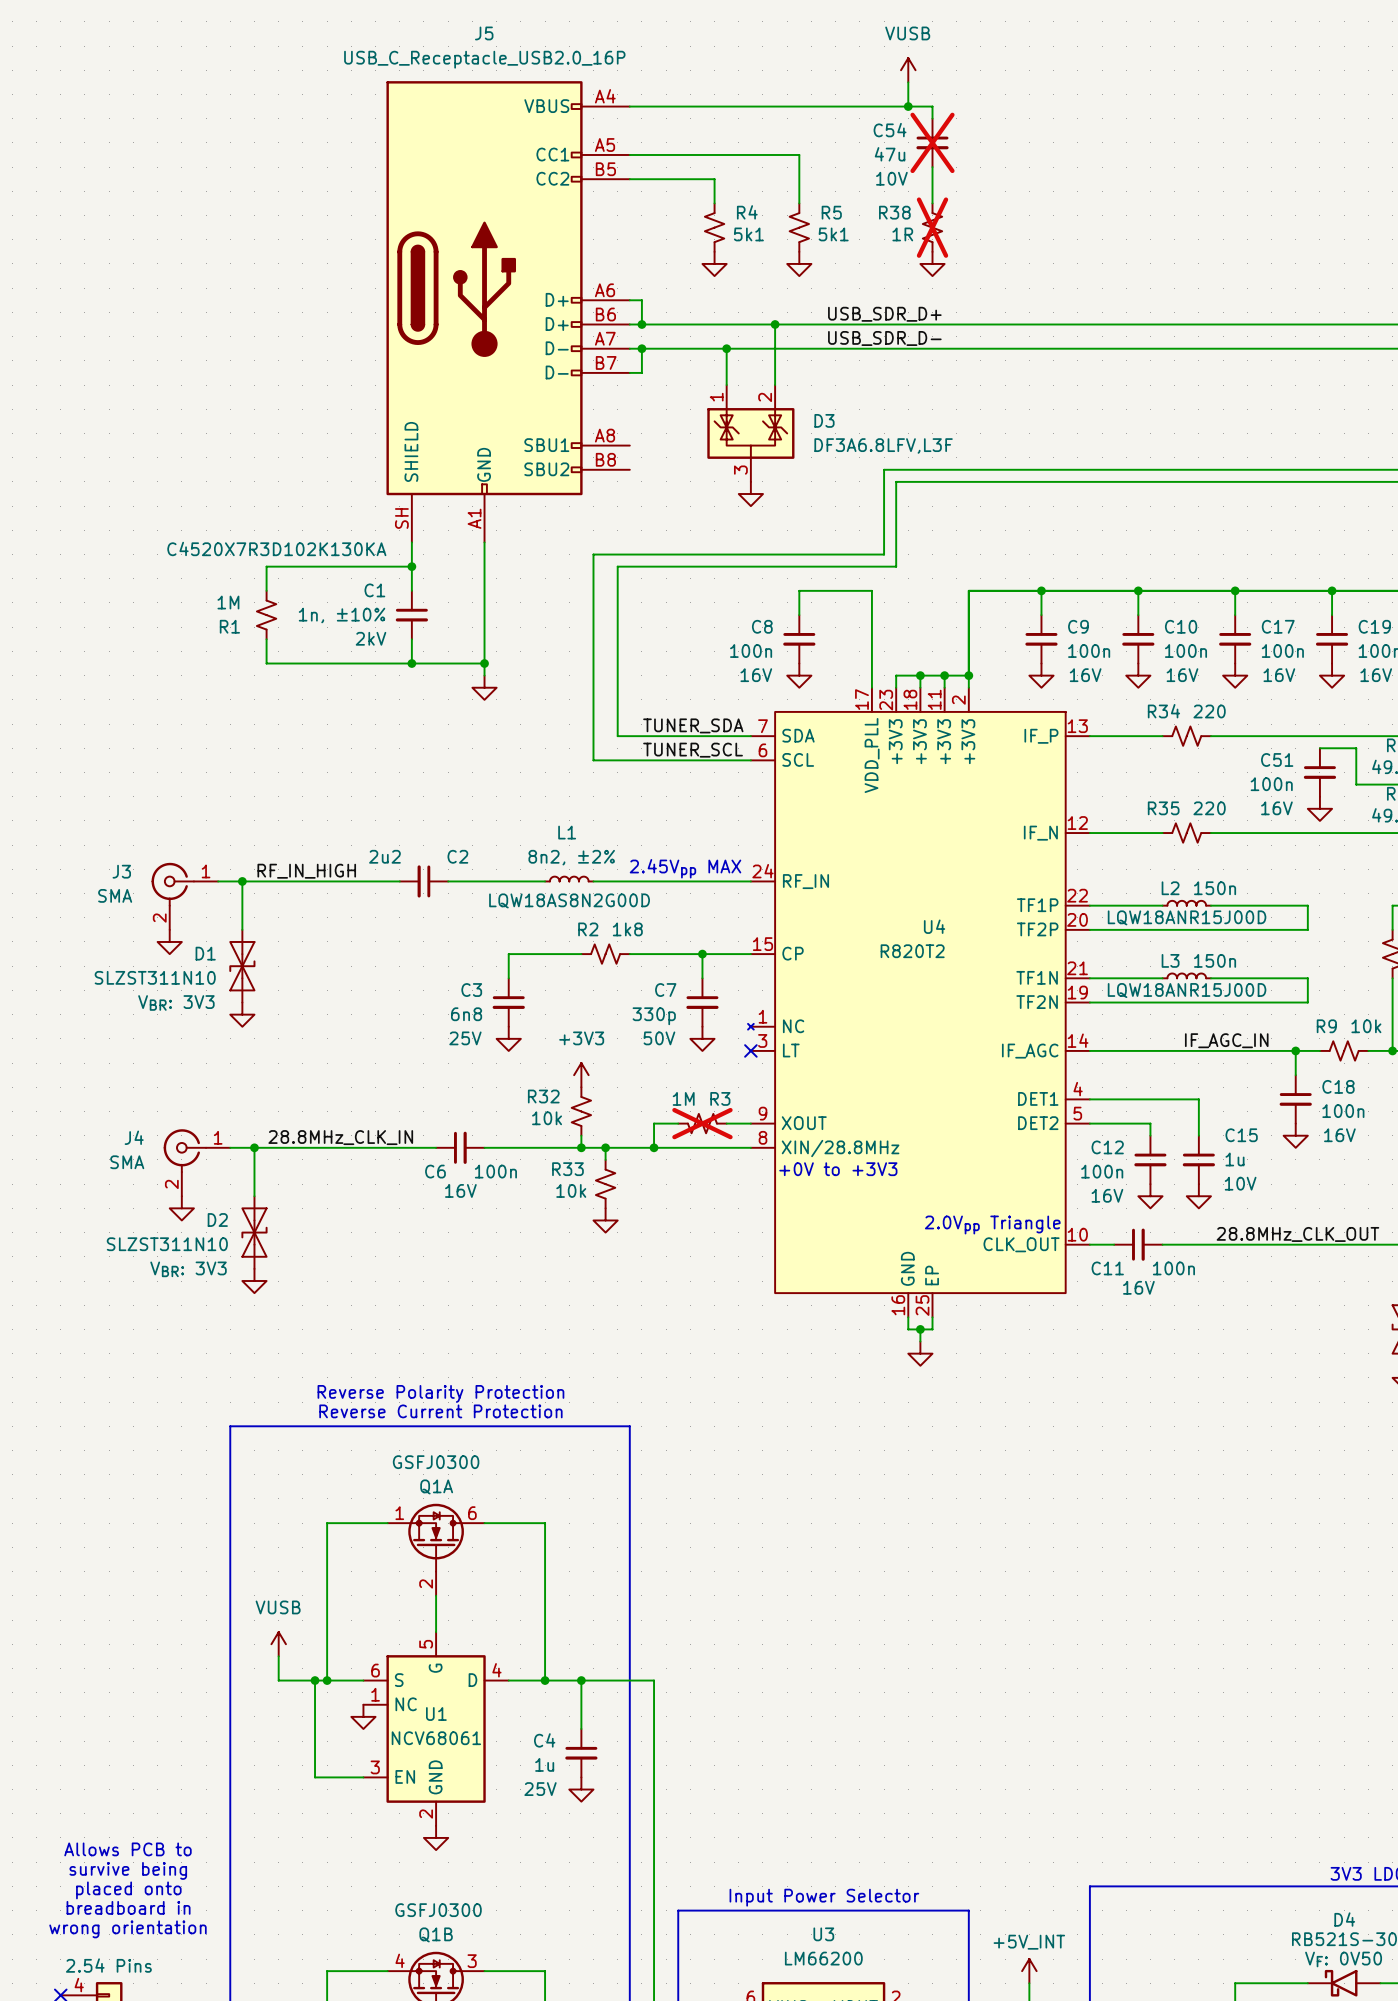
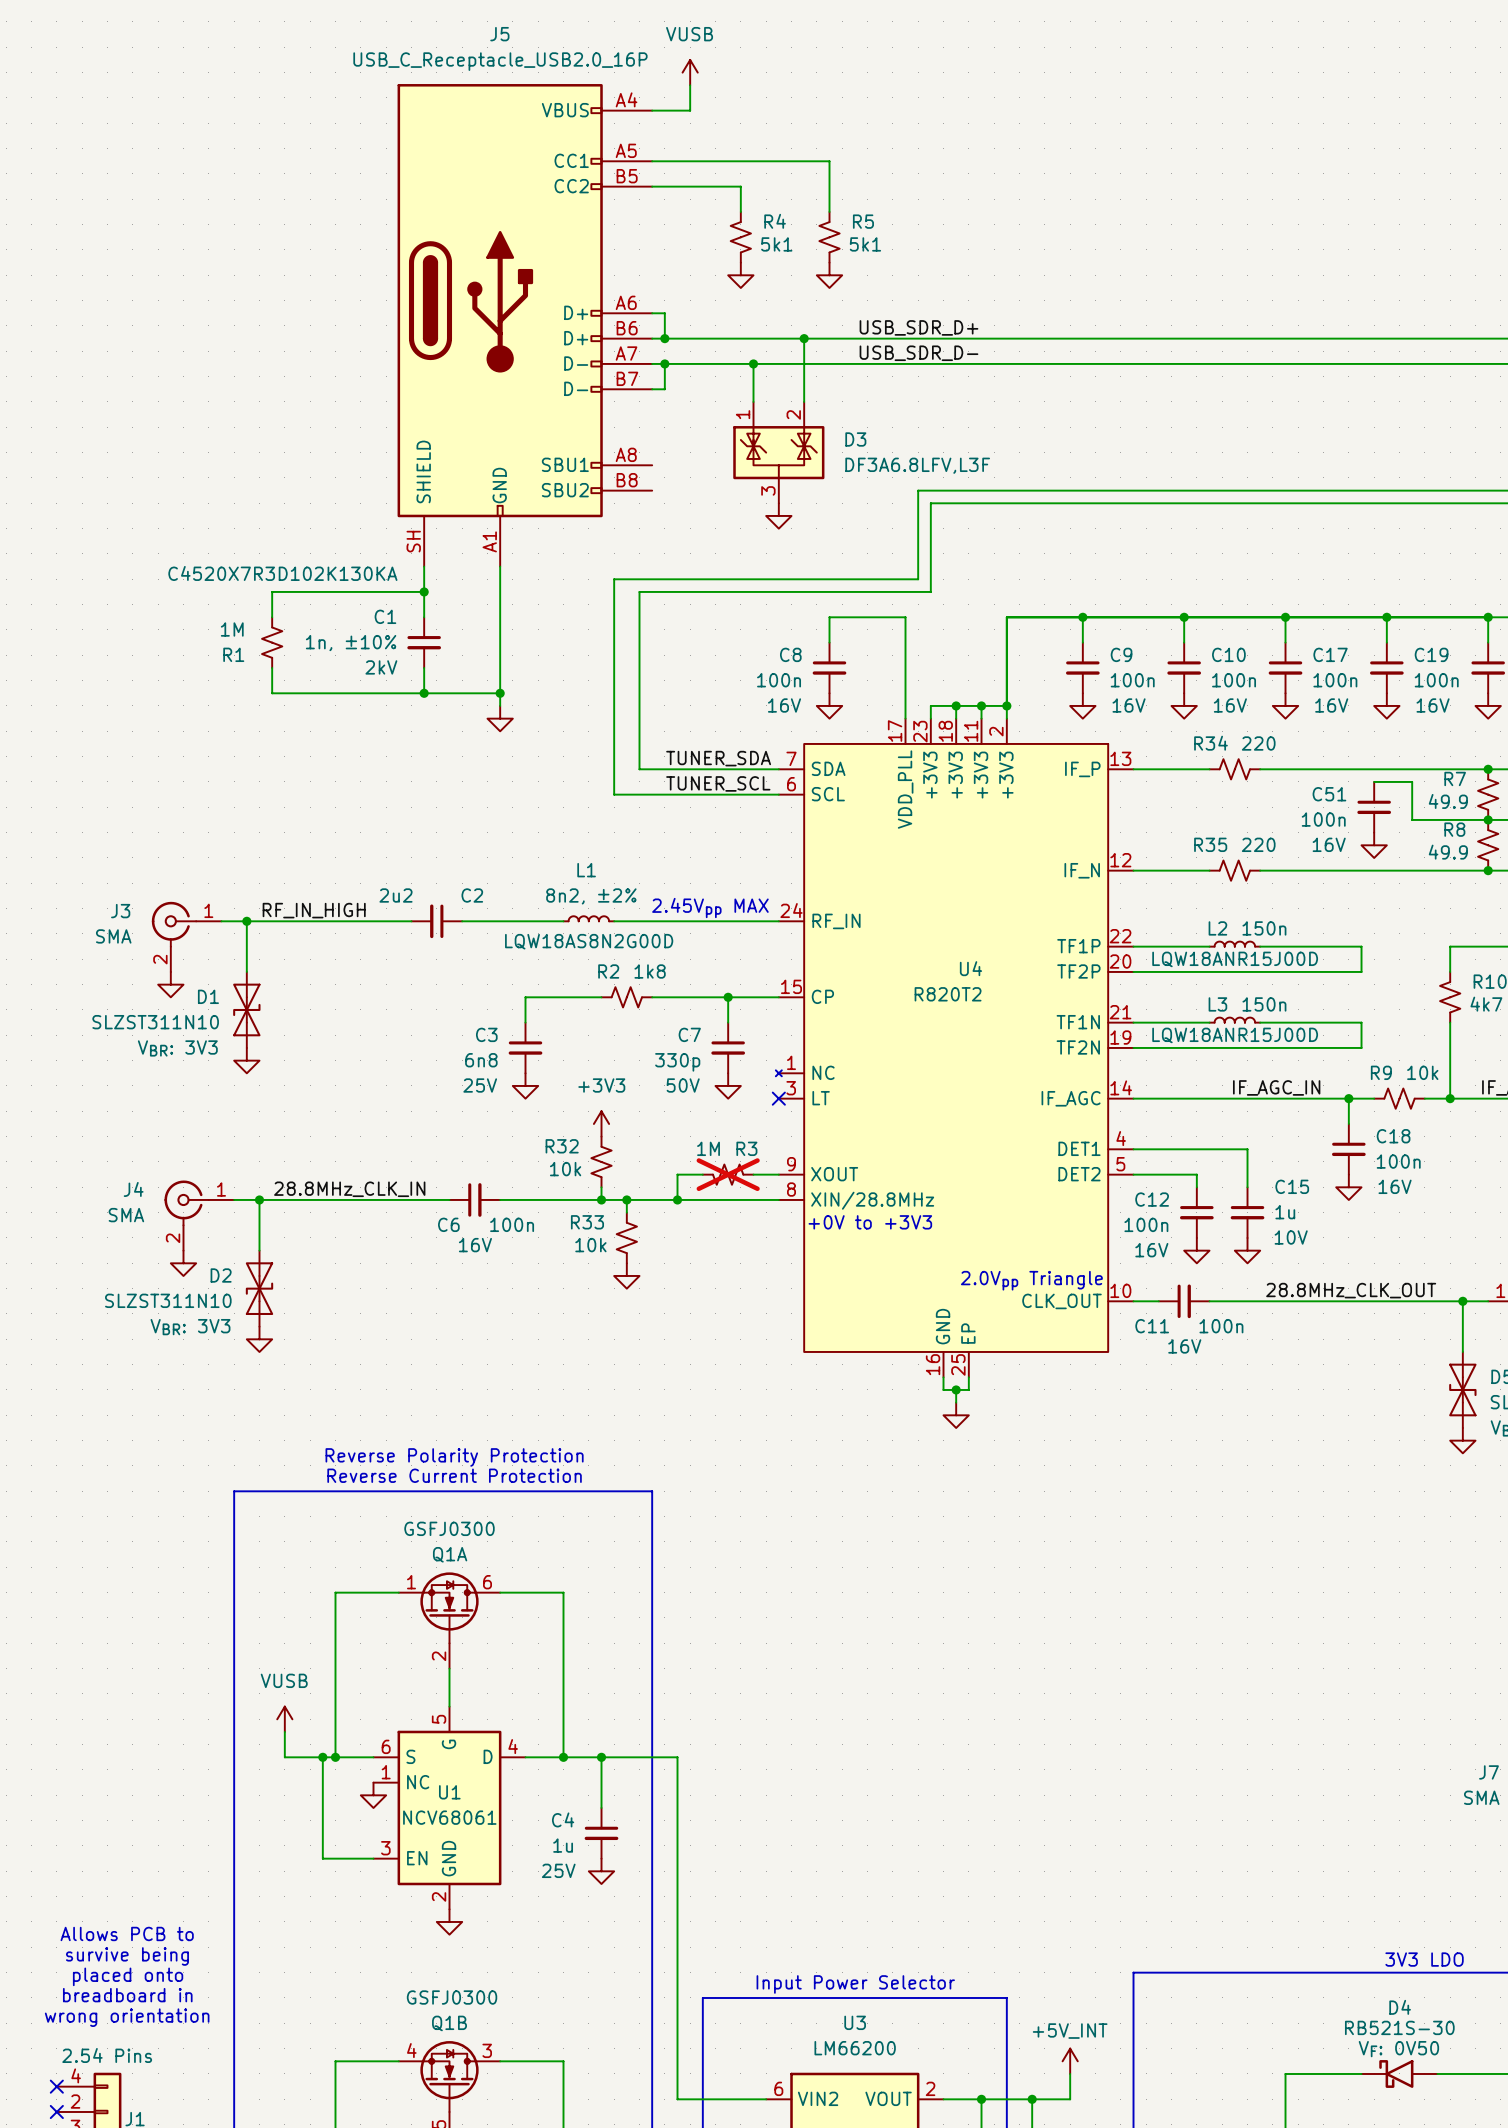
power symbol: none -> VUSB (690, 72)
power symbol: VUSB (908, 70) -> none
wire: (908, 82) (908, 106) -> none
wire: (666, 106) (932, 106) (932, 118) -> (690, 110) (690, 85)
junction: (908, 106) -> none
C54: 47u (932, 142) -> none
wire: (932, 167) (932, 203) -> none
R38: 1R (932, 227) -> none
power symbol: (932, 263) -> none

